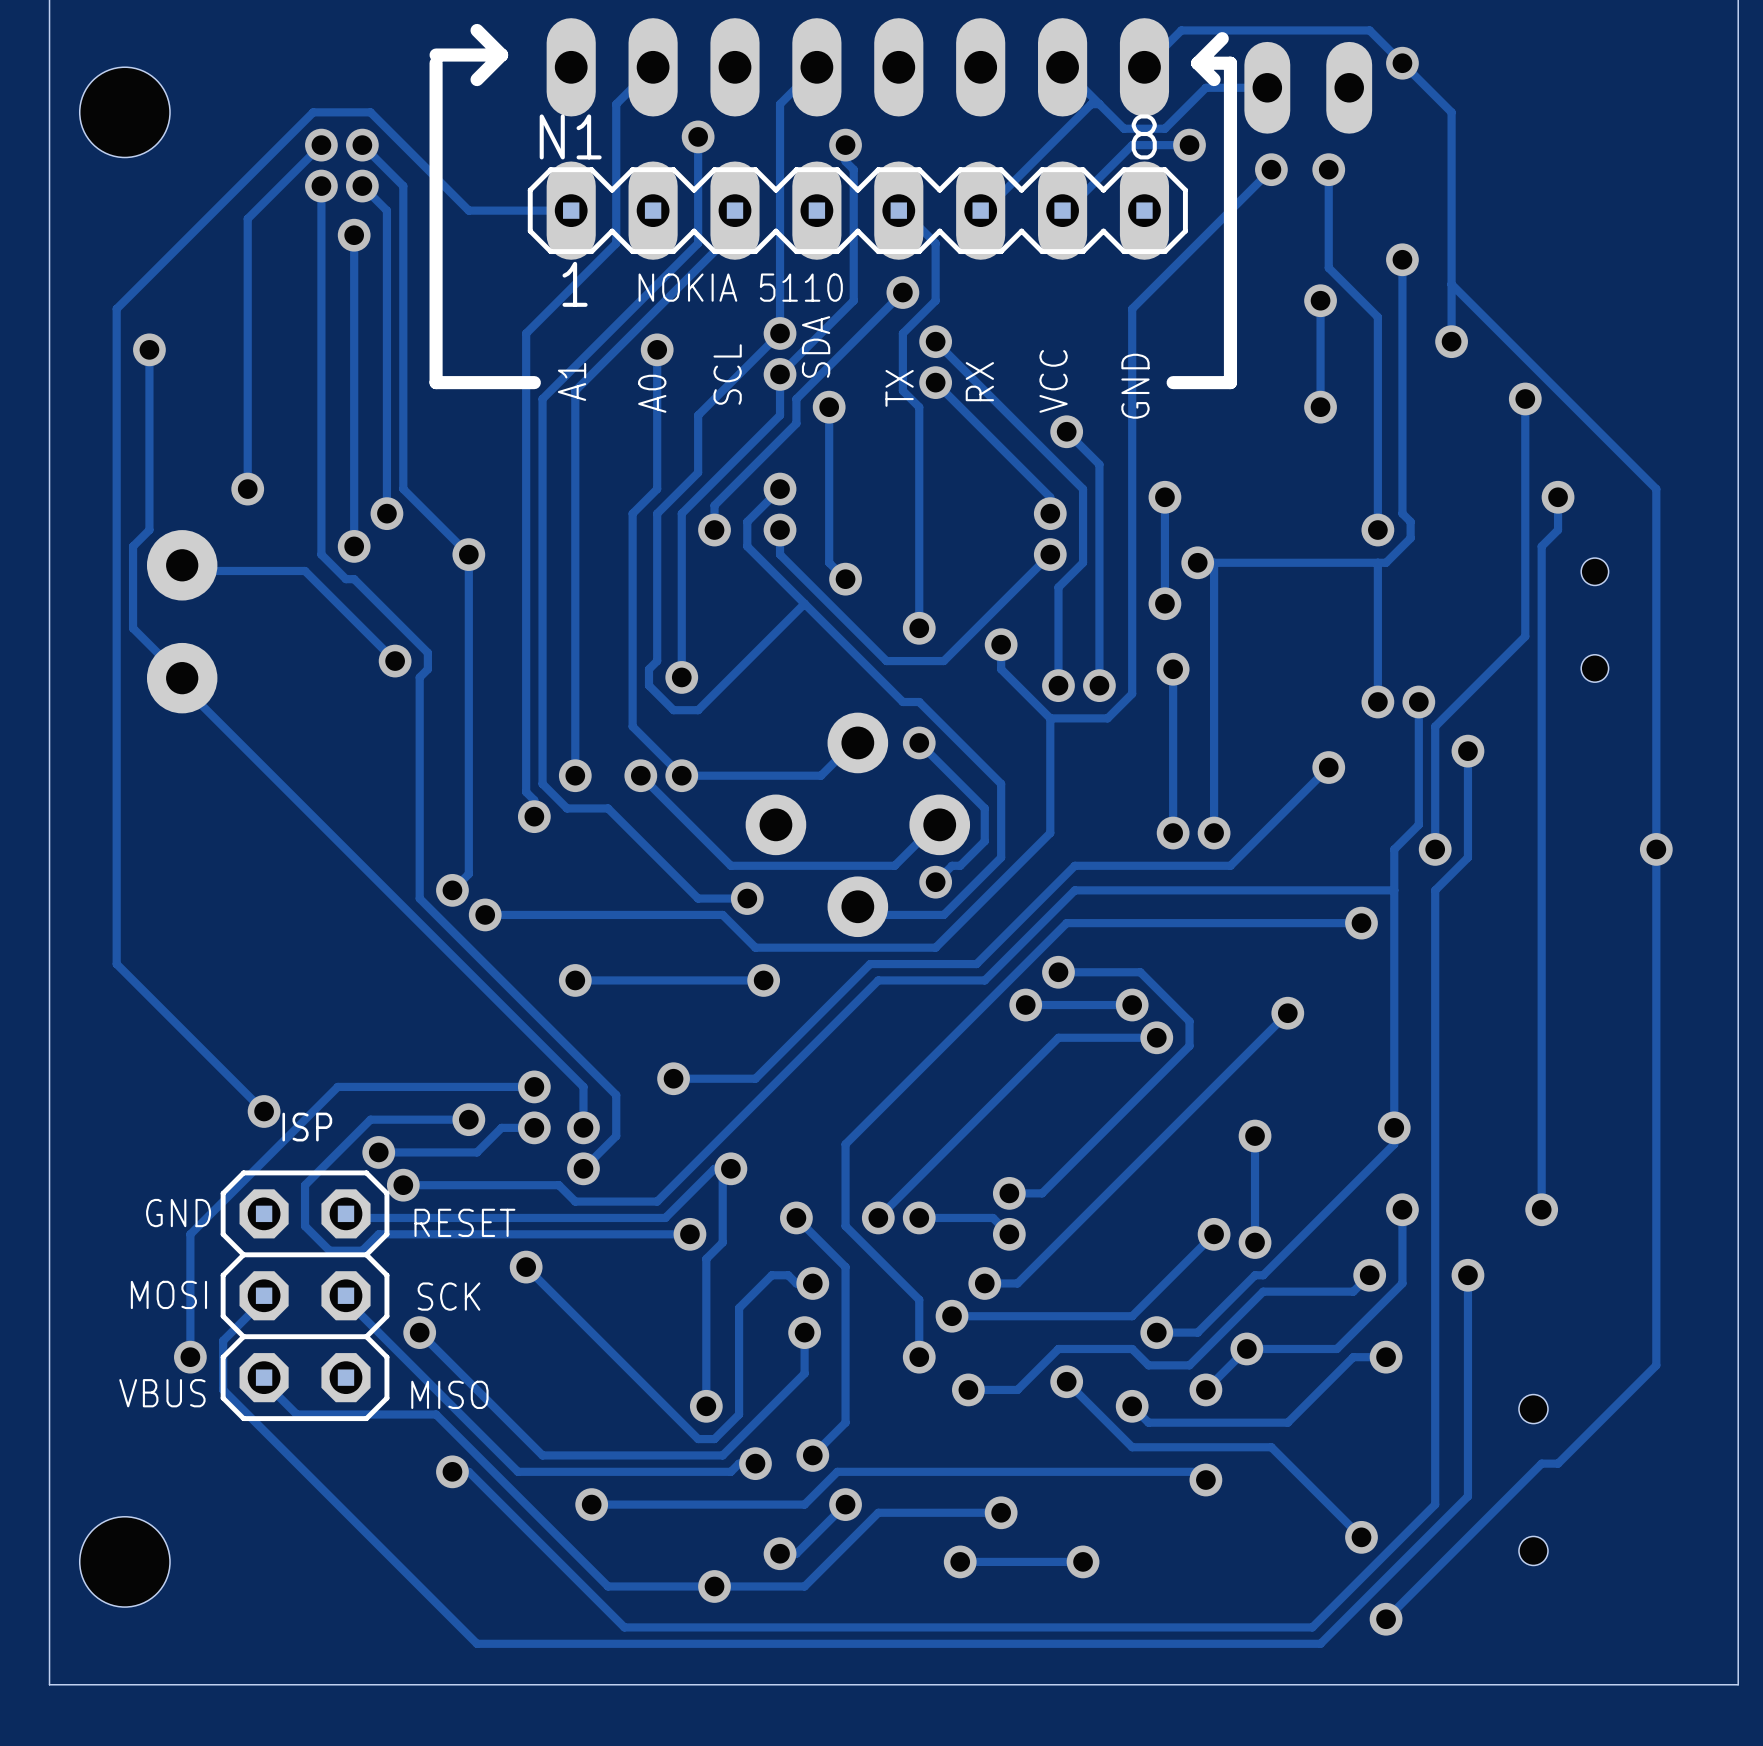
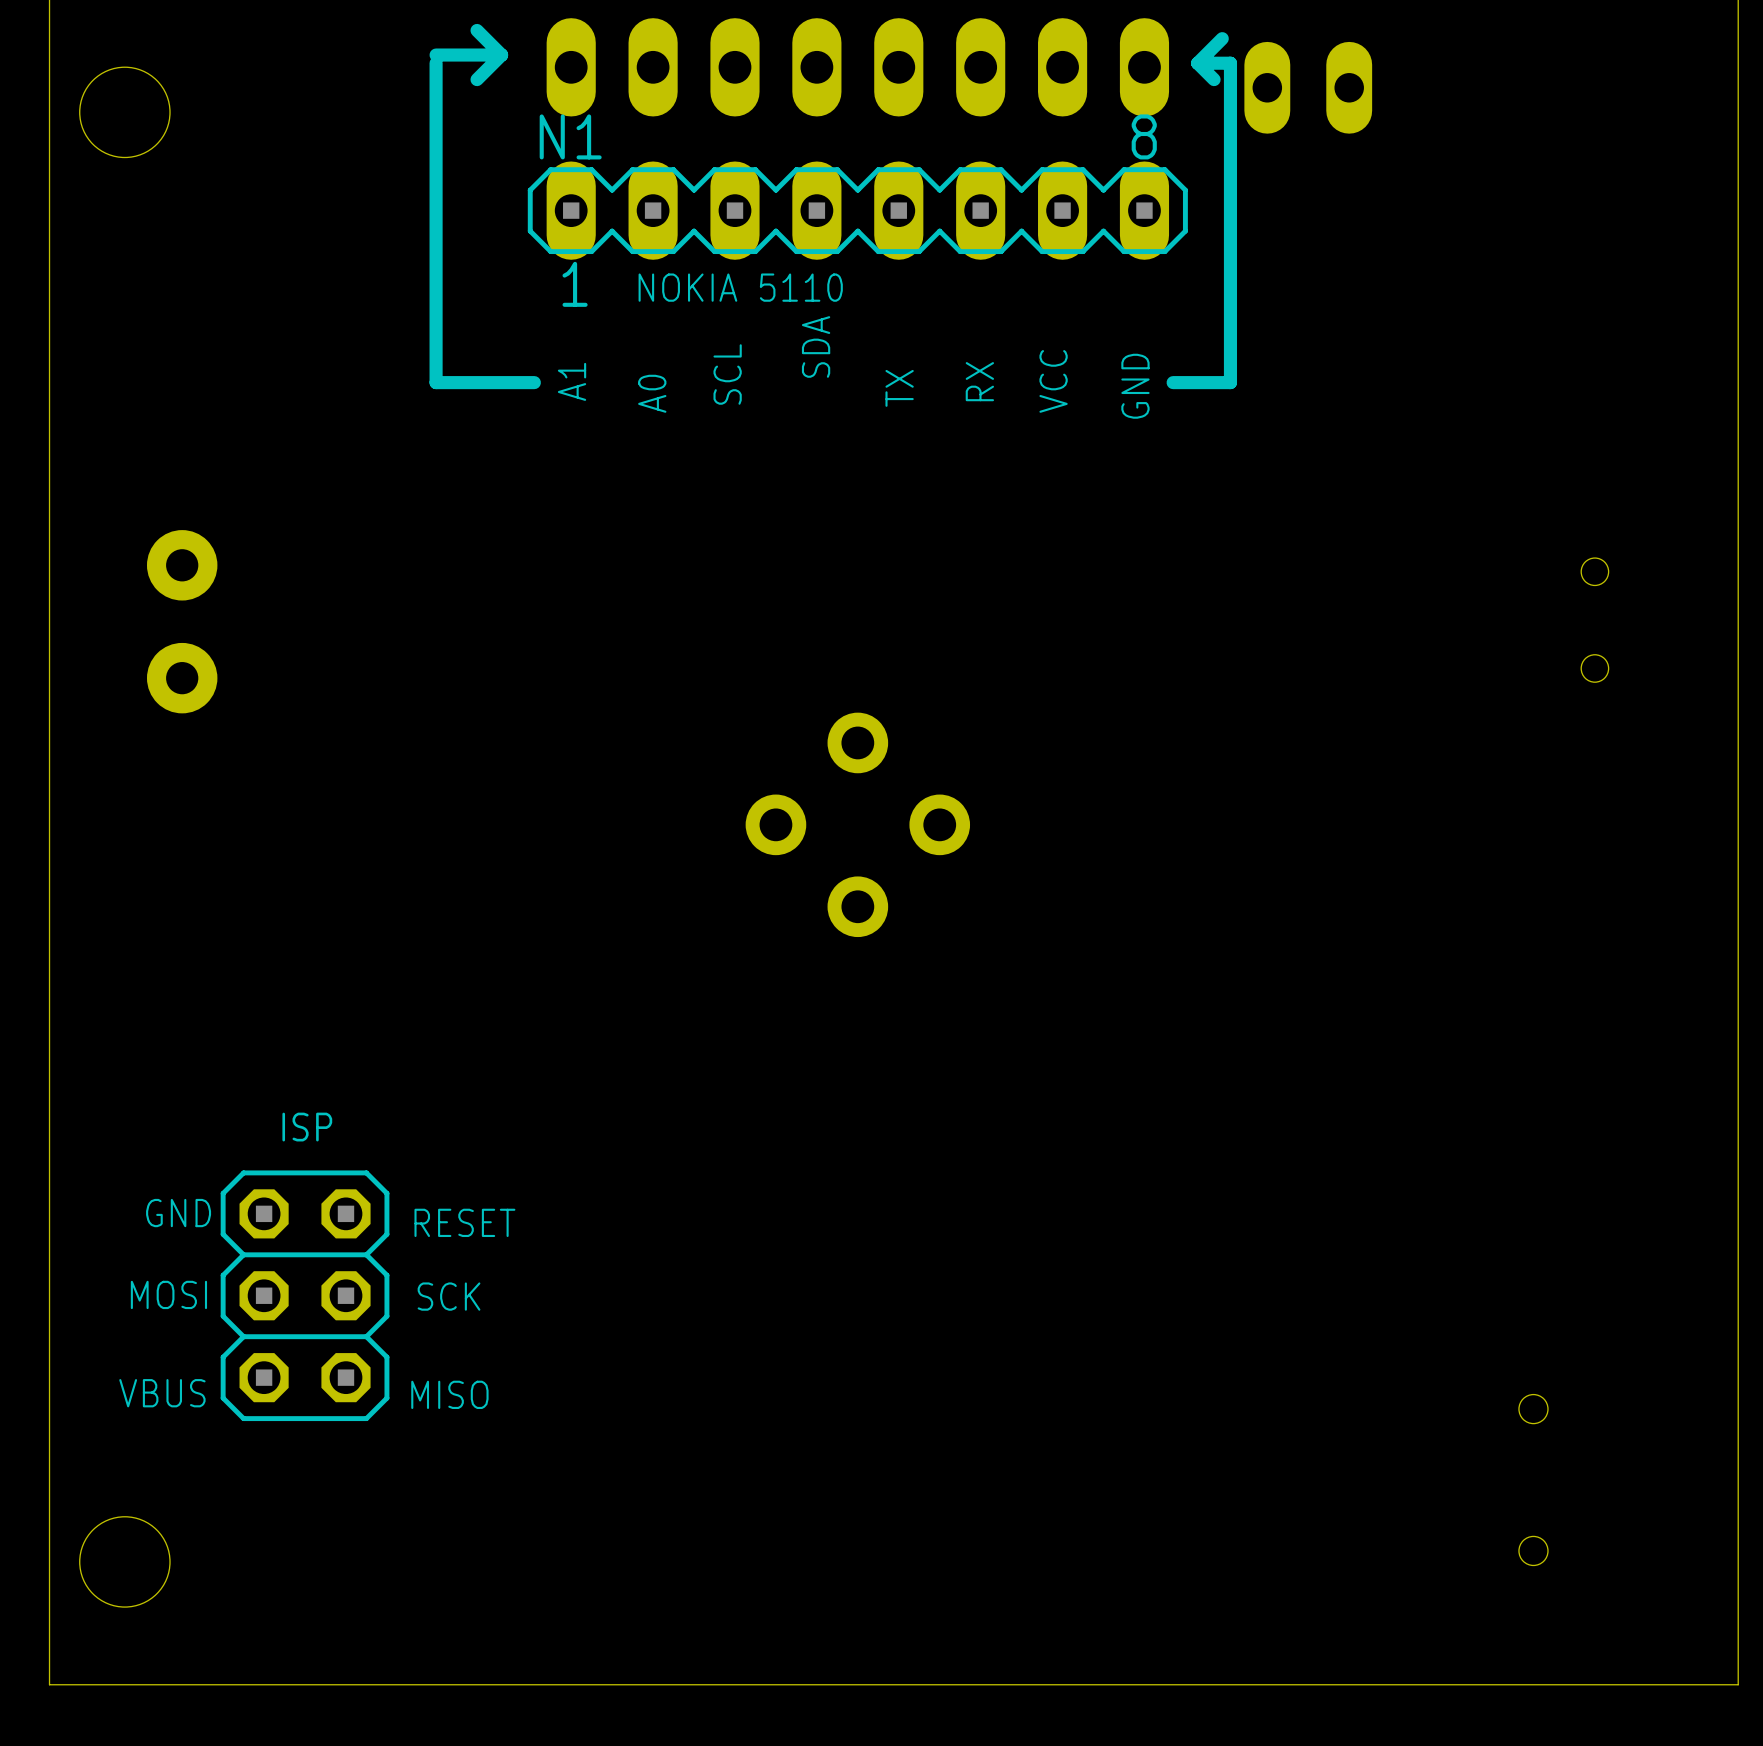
via: (1402, 63) -> none
track: (653, 67) (616, 104) (616, 243) (526, 333) (526, 792) (534, 800) (534, 816) -> none
track: (816, 67) (780, 104) (780, 333) (698, 415) (698, 472) (657, 513) (657, 661) (649, 669) (649, 685) (673, 710) (698, 710) (804, 603) -> none
track: (1062, 67) (1124, 128) (1164, 128) (1205, 87) (1267, 87) -> none
track: (1144, 67) (1181, 30) (1369, 30) (1451, 112) (1451, 341) -> none
track: (1099, 104) (1091, 104) (984, 210) (980, 210) -> none
track: (698, 136) (698, 243) (542, 398) (542, 783) (567, 808) (608, 808) (698, 898) (747, 898) -> none
via: (698, 136) -> none
track: (321, 145) (247, 218) (247, 489) -> none
via: (321, 145) -> none
track: (362, 145) (403, 186) (403, 489) (468, 554) (468, 873) (452, 890) -> none
via: (362, 145) -> none
track: (845, 145) (845, 161) (853, 169) (853, 300) (780, 374) (780, 415) (681, 513) (681, 677) -> none
via: (845, 145) -> none
track: (1189, 145) (1132, 145) (1066, 210) (1062, 210) -> none
via: (1189, 145) -> none
track: (1271, 169) (1132, 308) (1132, 693) (1107, 718) (1050, 718) -> none
via: (1271, 169) -> none
track: (1328, 169) (1328, 267) (1377, 317) (1377, 530) -> none
via: (1328, 169) -> none
track: (321, 186) (321, 554) (345, 579) (354, 579) (427, 652) (427, 669) (419, 677) (419, 898) (616, 1095) (616, 1136) (583, 1168) -> none
via: (321, 186) -> none
track: (362, 186) (386, 210) (386, 513) -> none
via: (362, 186) -> none
track: (571, 210) (468, 210) (370, 112) (313, 112) (116, 308) (116, 964) (264, 1111) -> none
track: (734, 210) (730, 210) (730, 235) (575, 390) (575, 775) -> none
track: (898, 210) (902, 210) (935, 243) (935, 300) (902, 333) (902, 390) (919, 407) (919, 628) -> none
track: (354, 235) (354, 546) -> none
via: (354, 235) -> none
track: (1402, 259) (1402, 513) (1410, 521) (1410, 538) (1386, 562) (1197, 562) -> none
via: (1402, 259) -> none
track: (1451, 284) (1656, 489) (1656, 1365) (1558, 1463) (1541, 1463) (1386, 1619) -> none
track: (902, 292) (796, 398) (796, 423) (714, 505) (714, 530) -> none
via: (902, 292) -> none
track: (1320, 300) (1320, 407) -> none
via: (1320, 300) -> none
via: (780, 333) -> none
track: (935, 341) (1083, 489) (1083, 562) (1058, 587) (1058, 685) -> none
via: (935, 341) -> none
via: (1451, 341) -> none
track: (149, 349) (149, 530) (133, 546) (133, 628) (182, 677) (182, 685) (583, 1086) (583, 1127) -> none
via: (149, 349) -> none
track: (657, 349) (657, 489) (632, 513) (632, 726) (681, 775) (820, 775) (853, 742) (857, 742) -> none
via: (657, 349) -> none
via: (780, 374) -> none
track: (935, 382) (1050, 497) (1050, 513) -> none
via: (935, 382) -> none
track: (1525, 398) (1525, 636) (1435, 726) (1435, 849) -> none
via: (1525, 398) -> none
track: (829, 407) (829, 562) (845, 579) -> none
via: (829, 407) -> none
via: (1320, 407) -> none
track: (1066, 431) (1099, 464) (1099, 685) -> none
via: (1066, 431) -> none
via: (247, 489) -> none
track: (780, 489) (747, 521) (747, 546) (902, 702) (919, 702) (1001, 783) (1001, 857) (943, 914) (870, 914) (861, 906) (857, 906) -> none
via: (780, 489) -> none
track: (1164, 497) (1164, 603) -> none
via: (1164, 497) -> none
track: (1558, 497) (1558, 530) (1541, 546) (1541, 1209) -> none
via: (1558, 497) -> none
via: (386, 513) -> none
via: (1050, 513) -> none
via: (714, 530) -> none
track: (780, 530) (780, 554) (886, 661) (943, 661) (1050, 554) -> none
via: (780, 530) -> none
via: (1377, 530) -> none
via: (354, 546) -> none
via: (468, 554) -> none
via: (1050, 554) -> none
via: (1197, 562) -> none
track: (1214, 562) (1214, 833) -> none
track: (1377, 562) (1377, 702) -> none
track: (182, 565) (182, 570) (305, 570) (395, 661) -> none
via: (845, 579) -> none
via: (1164, 603) -> none
via: (919, 628) -> none
track: (1001, 644) (1001, 669) (1050, 718) -> none
via: (1001, 644) -> none
via: (395, 661) -> none
track: (1173, 669) (1173, 833) -> none
via: (1173, 669) -> none
via: (681, 677) -> none
via: (1058, 685) -> none
via: (1099, 685) -> none
via: (1377, 702) -> none
track: (1418, 702) (1418, 824) (1394, 849) (1394, 1144) (1263, 1275) (1255, 1275) (1197, 1332) (1156, 1332) -> none
via: (1418, 702) -> none
track: (1050, 718) (1050, 833) (935, 947) (755, 947) (722, 914) (485, 914) -> none
track: (919, 742) (984, 808) (984, 841) (960, 865) (952, 865) (935, 882) -> none
via: (919, 742) -> none
track: (1467, 751) (1467, 857) (1435, 890) (1435, 1504) (1312, 1627) (624, 1627) (468, 1471) (452, 1471) -> none
via: (1467, 751) -> none
track: (1328, 767) (1230, 865) (1074, 865) (976, 964) (870, 964) (755, 1078) (673, 1078) -> none
via: (1328, 767) -> none
via: (575, 775) -> none
track: (640, 775) (730, 865) (894, 865) (935, 824) (939, 824) -> none
via: (640, 775) -> none
via: (681, 775) -> none
via: (534, 816) -> none
via: (1173, 833) -> none
via: (1214, 833) -> none
via: (1435, 849) -> none
via: (1656, 849) -> none
via: (935, 882) -> none
via: (452, 890) -> none
track: (1394, 890) (1074, 890) (984, 980) (878, 980) (657, 1201) (575, 1201) (558, 1185) (403, 1185) -> none
via: (747, 898) -> none
via: (485, 914) -> none
track: (1361, 923) (1066, 923) (845, 1144) (845, 1226) (919, 1299) (919, 1357) -> none
via: (1361, 923) -> none
track: (1058, 972) (1140, 972) (1189, 1021) (1189, 1045) (1042, 1193) (1009, 1193) -> none
via: (1058, 972) -> none
via: (575, 980) -> none
track: (763, 980) (575, 980) -> none
via: (763, 980) -> none
via: (1025, 1005) -> none
track: (1132, 1005) (1025, 1005) -> none
via: (1132, 1005) -> none
track: (1287, 1013) (1017, 1283) (984, 1283) -> none
via: (1287, 1013) -> none
track: (1156, 1037) (1058, 1037) (878, 1217) -> none
via: (1156, 1037) -> none
via: (673, 1078) -> none
track: (534, 1086) (337, 1086) (190, 1234) (190, 1357) -> none
via: (534, 1086) -> none
via: (264, 1111) -> none
track: (468, 1119) (370, 1119) (305, 1185) (305, 1226) (329, 1250) (362, 1250) (378, 1234) (689, 1234) -> none
via: (468, 1119) -> none
track: (534, 1127) (501, 1127) (477, 1152) (378, 1152) -> none
via: (534, 1127) -> none
via: (583, 1127) -> none
via: (1394, 1127) -> none
track: (1255, 1136) (1255, 1242) -> none
via: (1255, 1136) -> none
via: (378, 1152) -> none
via: (583, 1168) -> none
track: (722, 1168) (722, 1242) (706, 1258) (706, 1406) -> none
track: (730, 1168) (714, 1168) (665, 1217) (345, 1217) (345, 1213) -> none
via: (730, 1168) -> none
via: (403, 1185) -> none
via: (1009, 1193) -> none
track: (1402, 1209) (1402, 1283) (1336, 1348) (1246, 1348) (1205, 1389) -> none
via: (1402, 1209) -> none
via: (1541, 1209) -> none
track: (796, 1217) (845, 1267) (845, 1422) (812, 1455) -> none
via: (796, 1217) -> none
via: (878, 1217) -> none
track: (919, 1217) (992, 1217) (1009, 1234) -> none
via: (919, 1217) -> none
via: (689, 1234) -> none
via: (1009, 1234) -> none
track: (1214, 1234) (1132, 1316) (952, 1316) -> none
via: (1214, 1234) -> none
via: (1255, 1242) -> none
track: (526, 1267) (698, 1439) (714, 1439) (739, 1414) (739, 1308) (771, 1275) (788, 1275) (796, 1283) (812, 1283) -> none
via: (526, 1267) -> none
track: (1369, 1275) (1353, 1291) (1263, 1291) (1189, 1365) (1148, 1365) (1132, 1348) (1058, 1348) (1017, 1389) (968, 1389) -> none
via: (1369, 1275) -> none
track: (1467, 1275) (1467, 1496) (1320, 1643) (477, 1643) (223, 1389) (223, 1340) (264, 1299) (264, 1295) -> none
via: (1467, 1275) -> none
via: (812, 1283) -> none
via: (984, 1283) -> none
track: (345, 1295) (345, 1299) (517, 1471) (730, 1471) (739, 1463) (755, 1463) -> none
via: (952, 1316) -> none
via: (419, 1332) -> none
track: (804, 1332) (804, 1373) (722, 1455) (542, 1455) (419, 1332) -> none
via: (804, 1332) -> none
via: (1156, 1332) -> none
via: (1246, 1348) -> none
via: (190, 1357) -> none
via: (919, 1357) -> none
track: (1386, 1357) (1353, 1357) (1287, 1422) (1148, 1422) (1132, 1406) -> none
via: (1386, 1357) -> none
track: (264, 1377) (264, 1381) (296, 1414) (436, 1414) (608, 1586) (804, 1586) (878, 1512) (1001, 1512) -> none
track: (1066, 1381) (1132, 1447) (1271, 1447) (1361, 1537) -> none
via: (1066, 1381) -> none
via: (968, 1389) -> none
via: (1205, 1389) -> none
via: (706, 1406) -> none
via: (1132, 1406) -> none
via: (812, 1455) -> none
via: (755, 1463) -> none
via: (452, 1471) -> none
track: (1205, 1480) (1197, 1471) (837, 1471) (804, 1504) (591, 1504) -> none
via: (1205, 1480) -> none
via: (591, 1504) -> none
track: (845, 1504) (796, 1553) (780, 1553) -> none
via: (845, 1504) -> none
via: (1001, 1512) -> none
via: (1361, 1537) -> none
via: (780, 1553) -> none
via: (960, 1561) -> none
track: (1083, 1561) (960, 1561) -> none
via: (1083, 1561) -> none
via: (714, 1586) -> none
via: (1386, 1619) -> none

